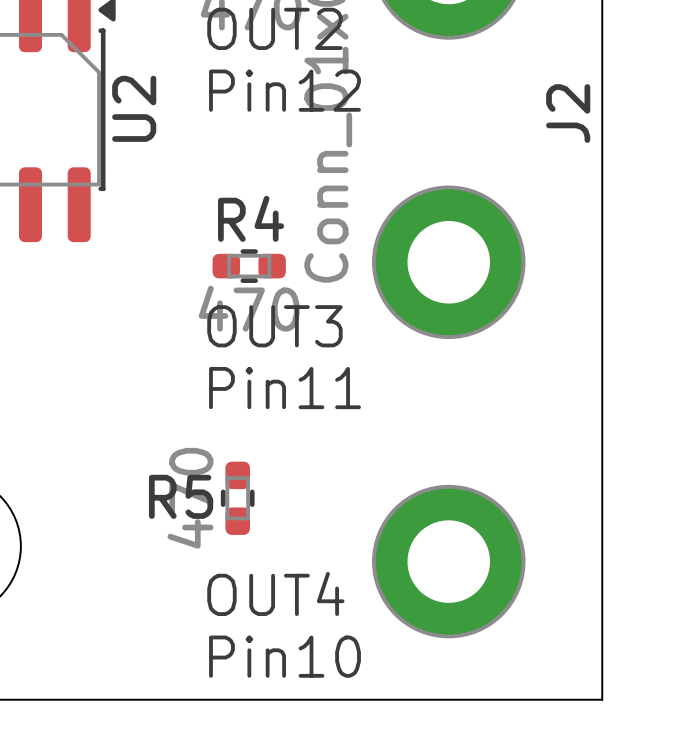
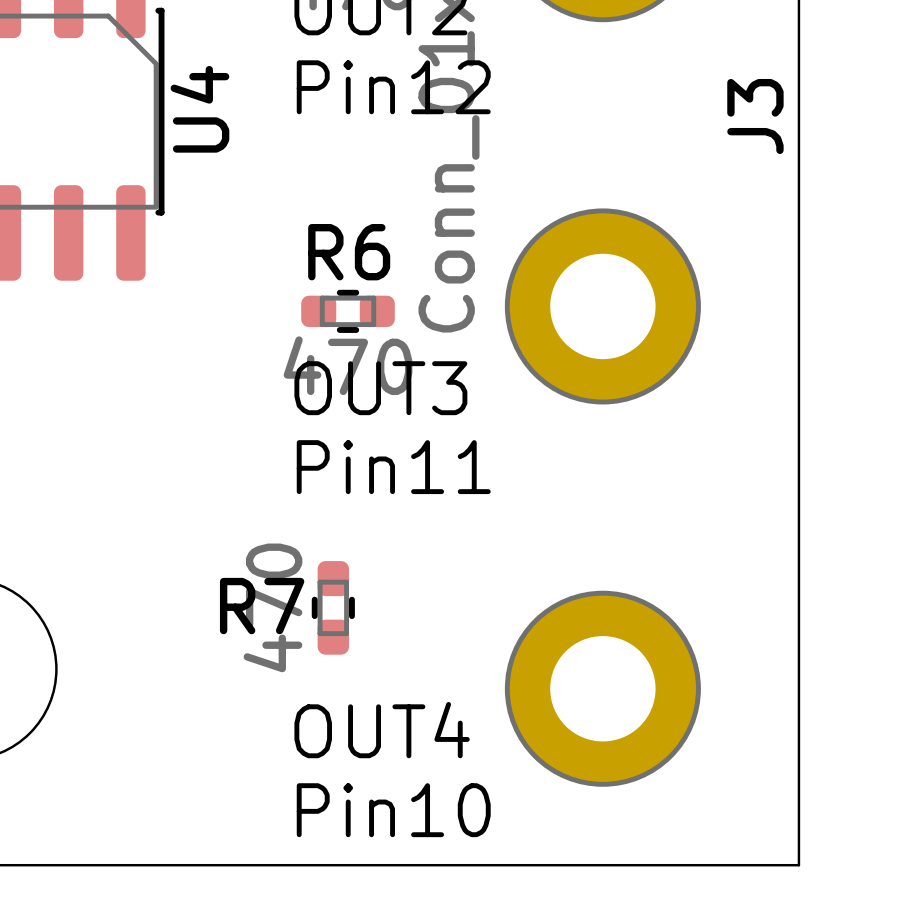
U2 name: U2 (134, 108) -> U4 (199, 109)
J2 name: J2 (568, 113) -> J3 (755, 116)
R4 name: R4 (251, 218) -> R6 (349, 252)
R5 name: R5 (181, 496) -> R7 (262, 606)

